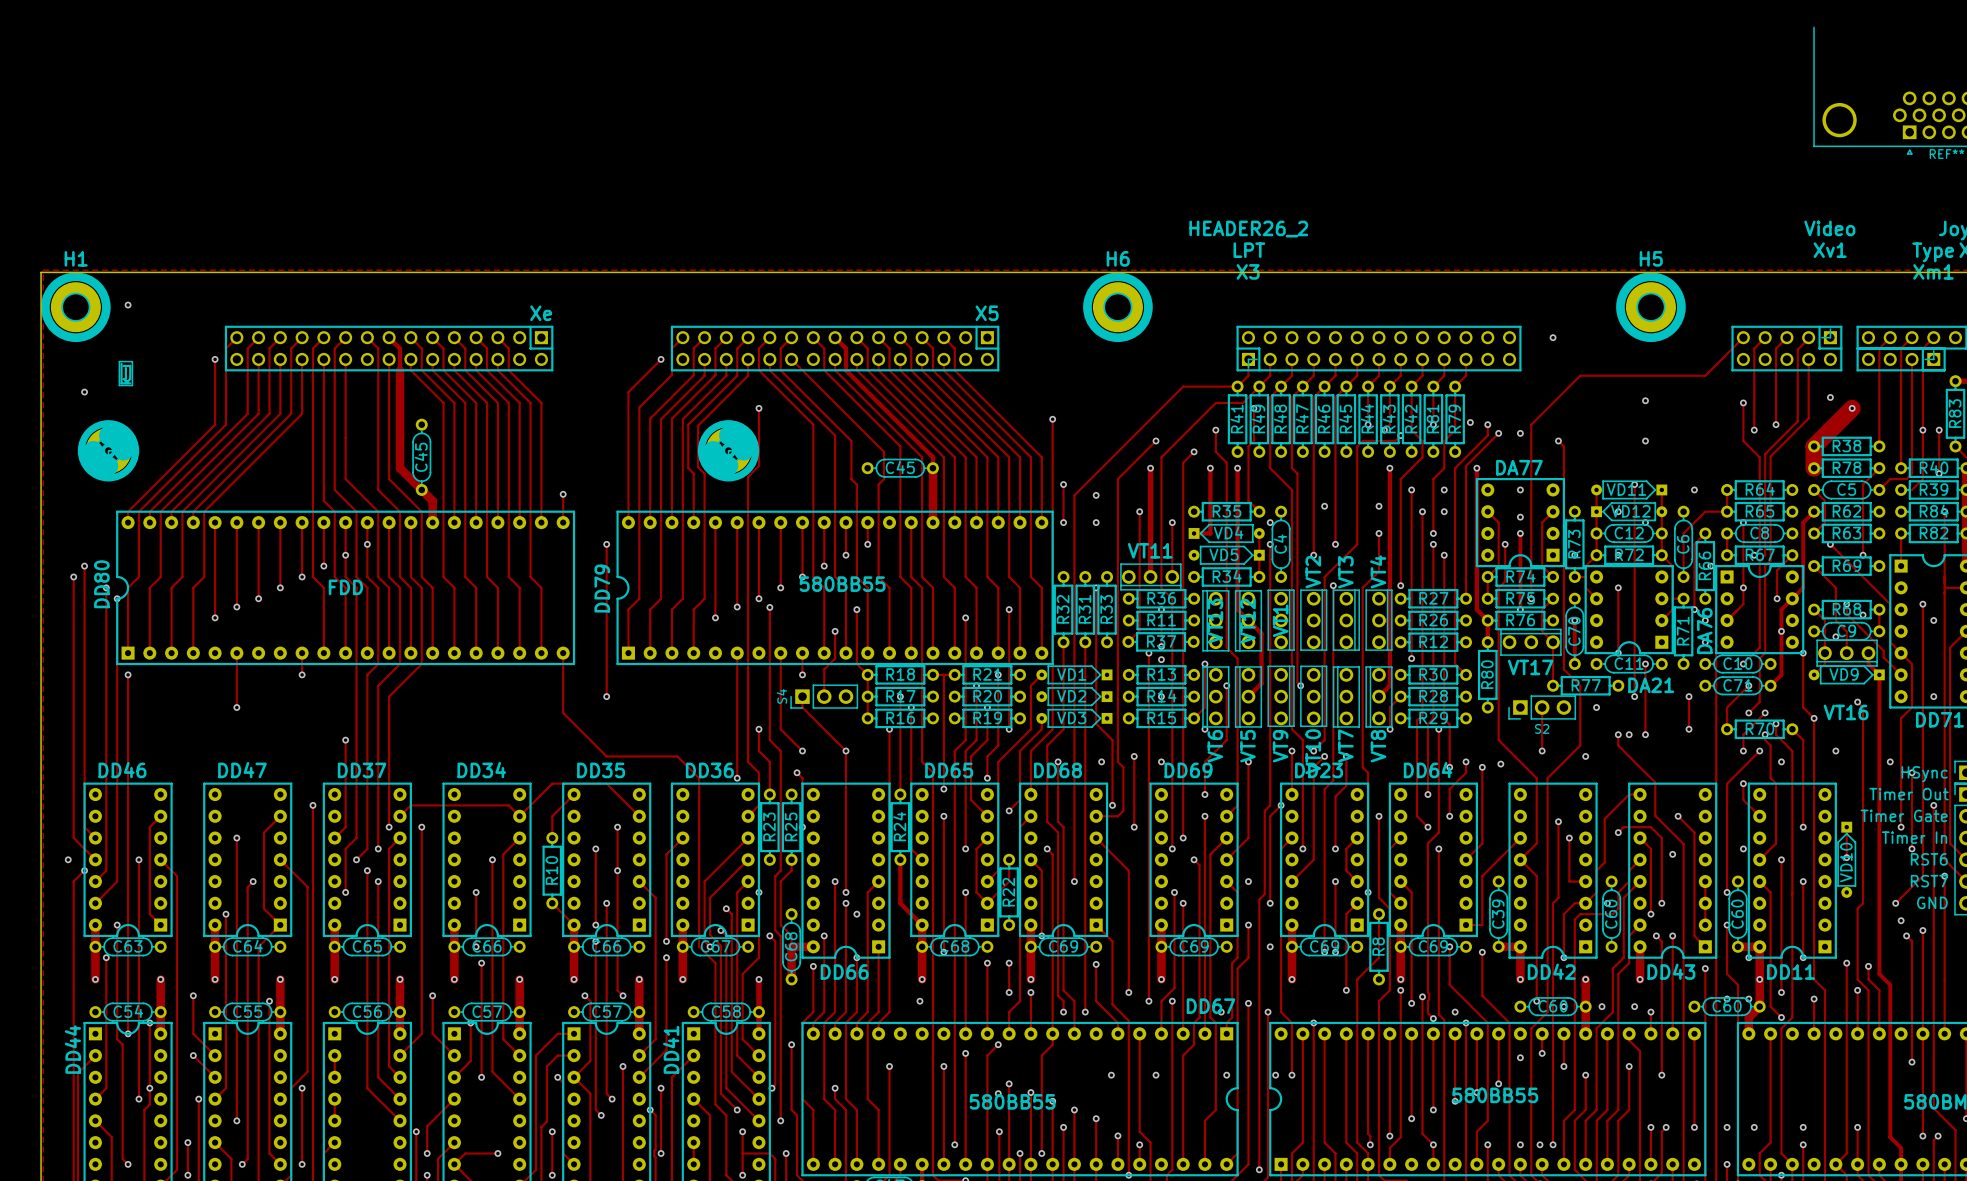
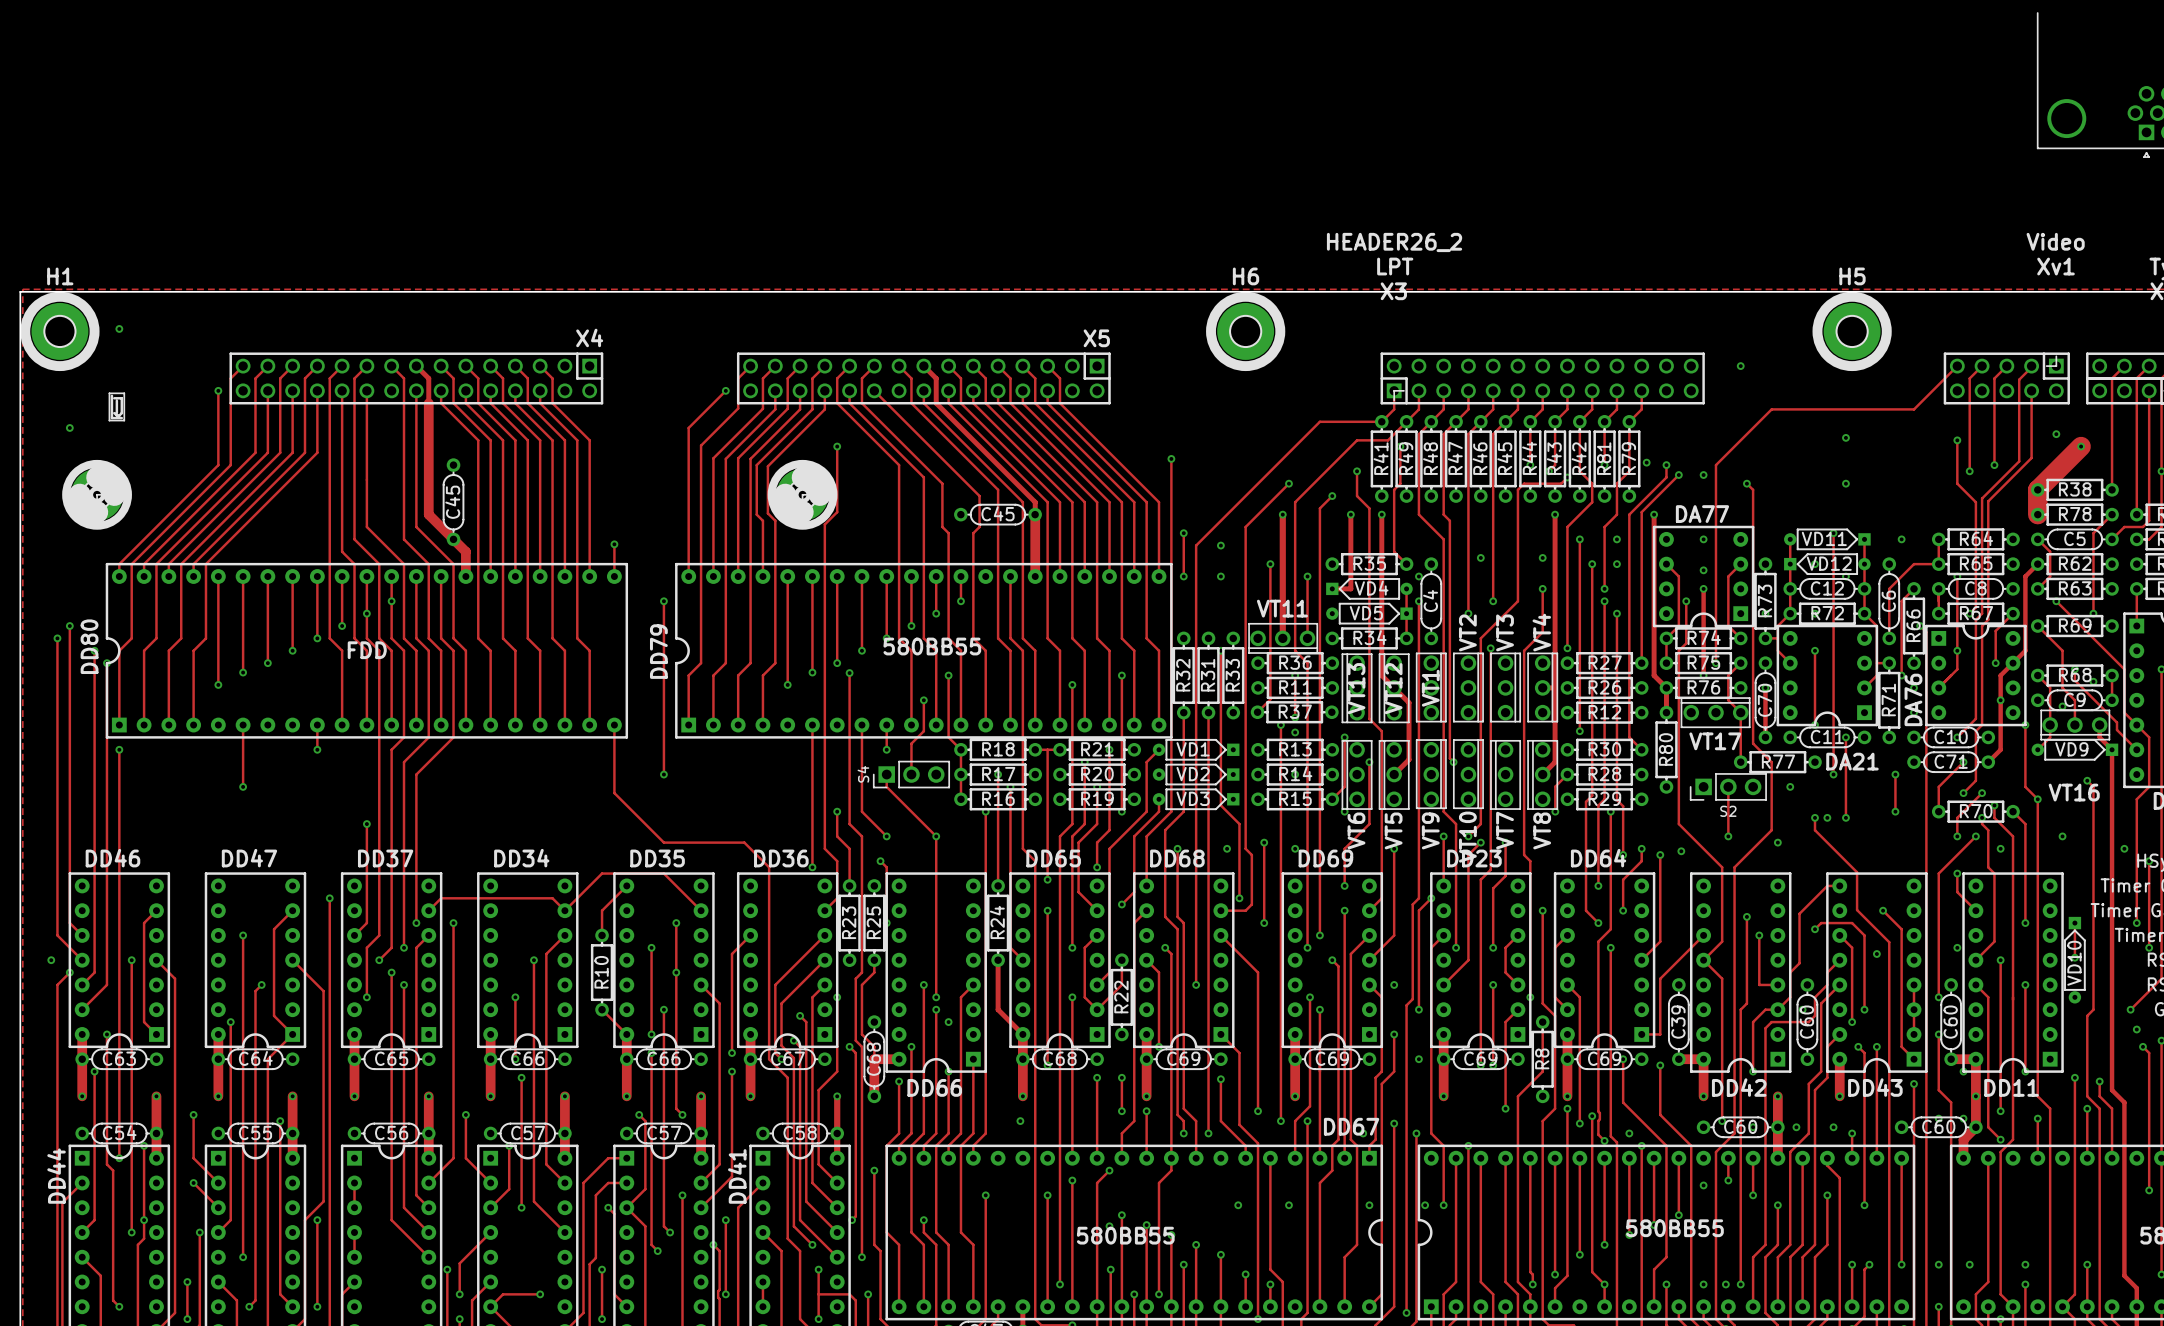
Xe name: Xe (541, 313) -> X4 (589, 337)

